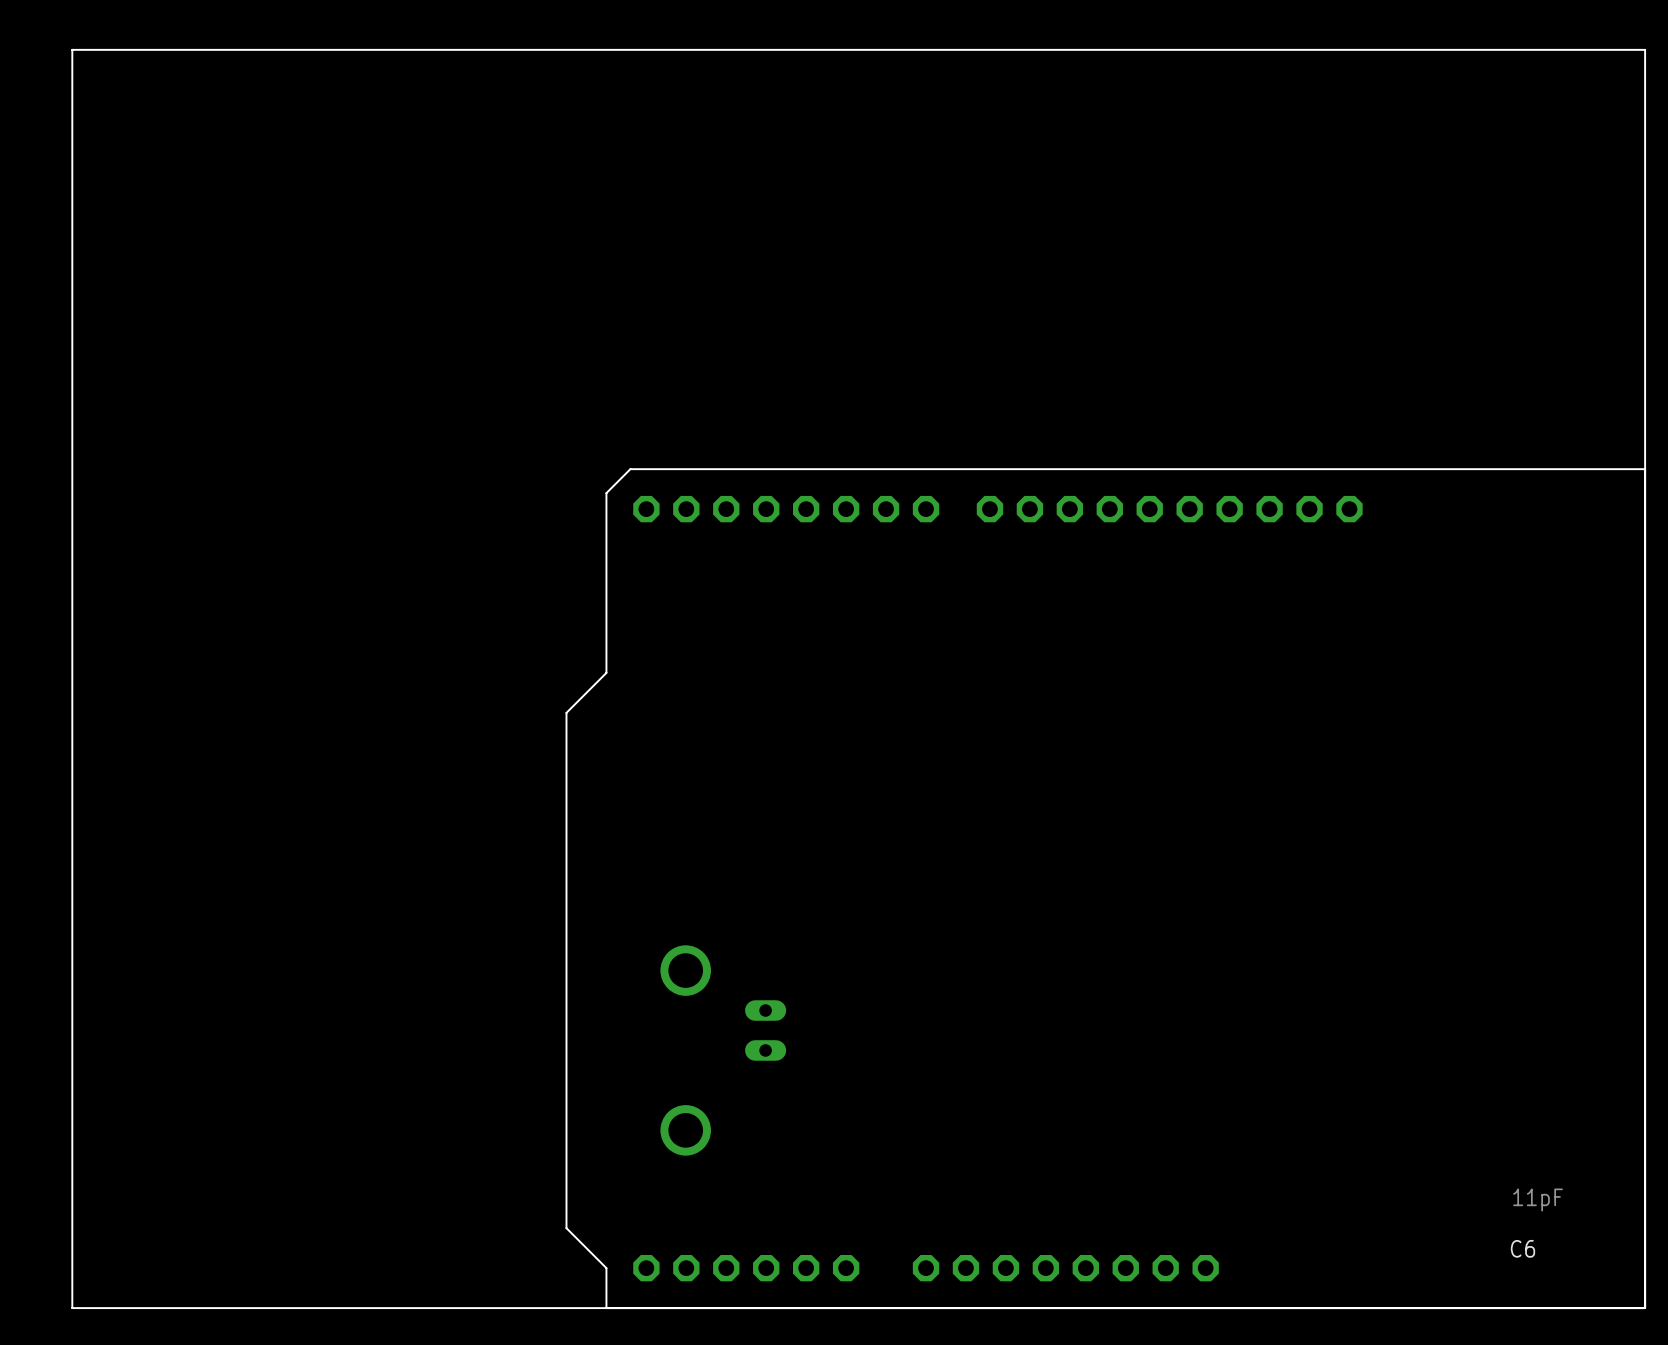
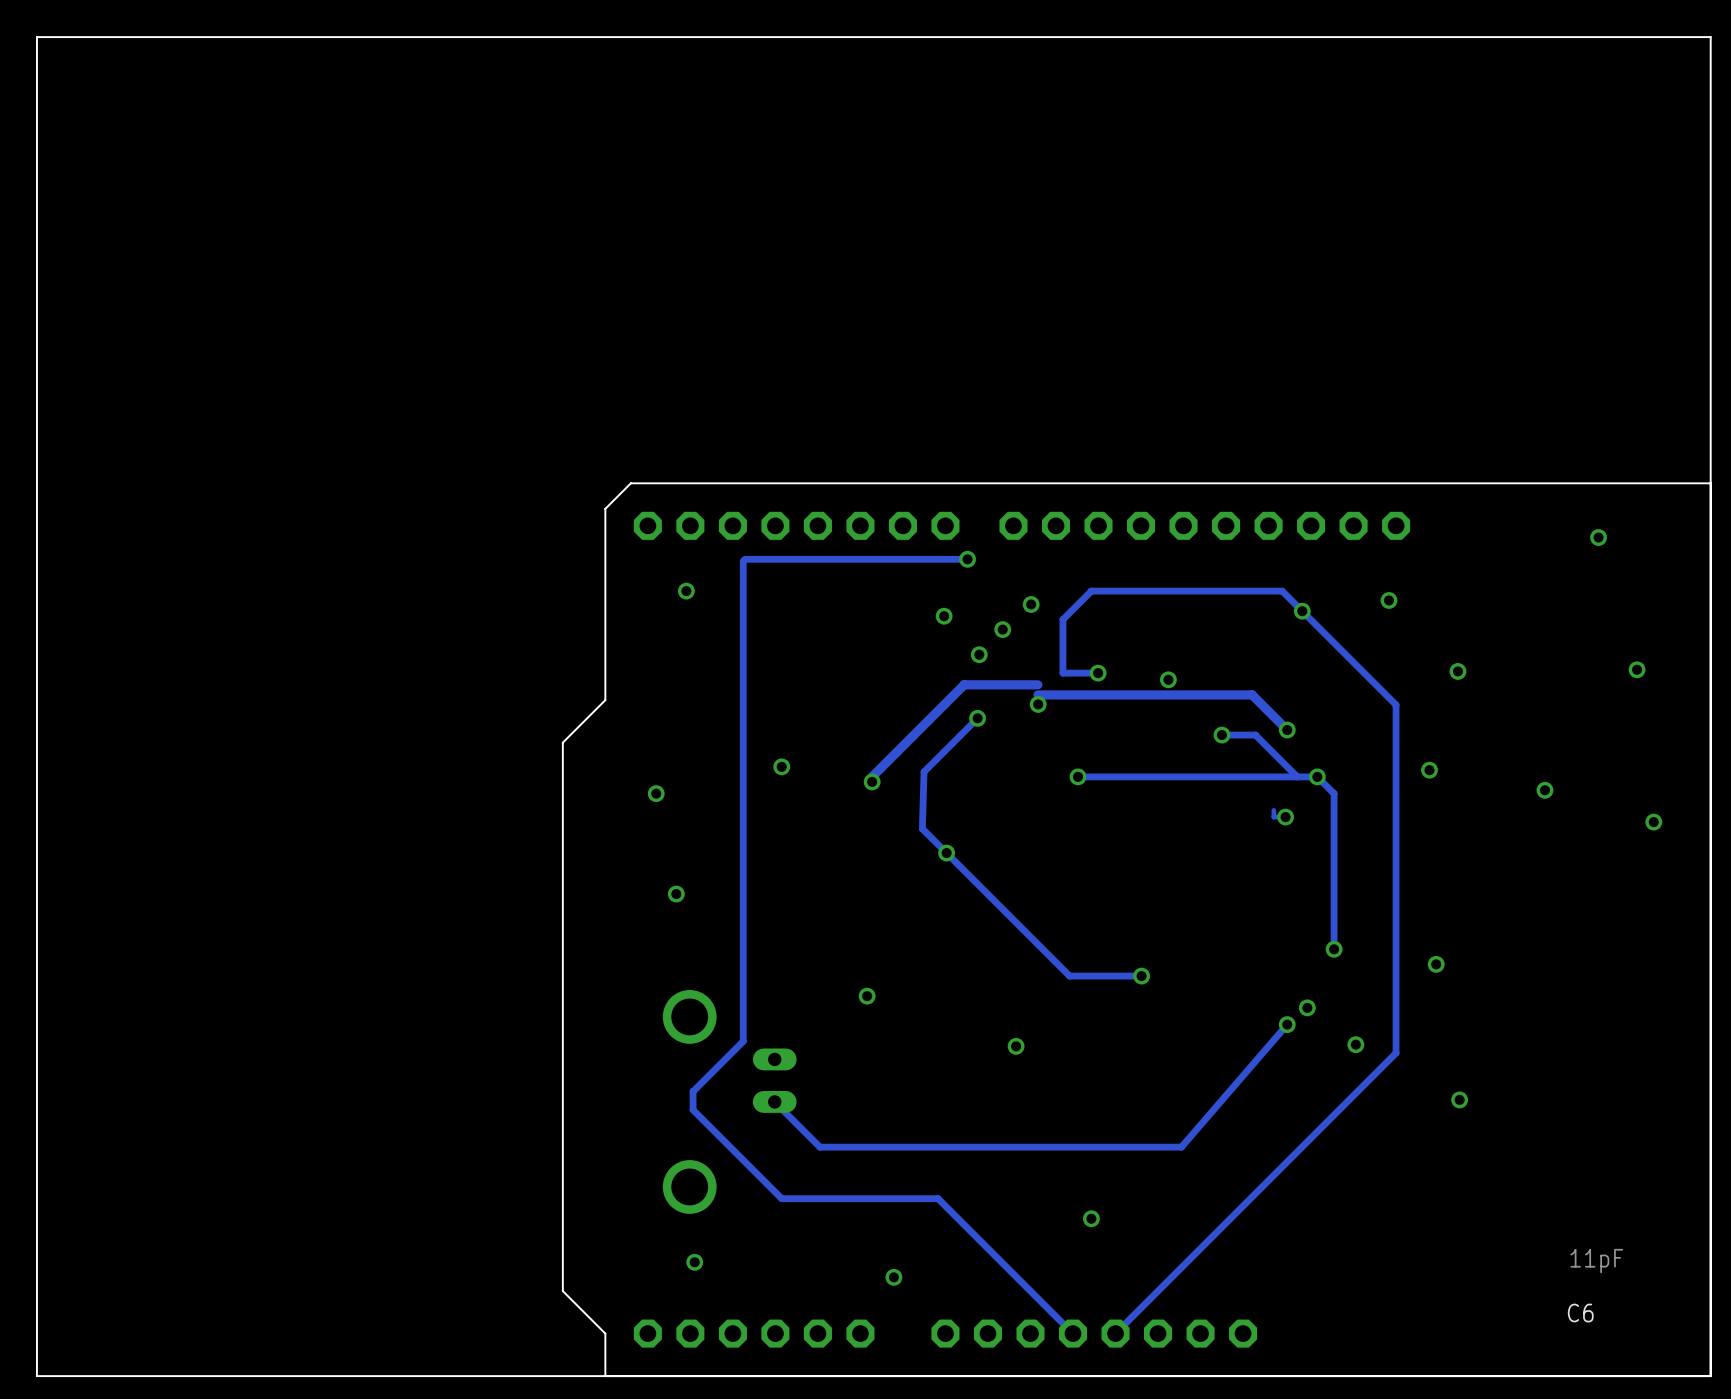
via: none -> (1598, 537)
track: none -> (967, 559) (744, 559) (743, 560) (743, 1041) (693, 1091) (693, 1109) (781, 1198) (938, 1198) (1073, 1333)
via: none -> (967, 559)
via: none -> (686, 591)
via: none -> (1389, 600)
via: none -> (1031, 604)
via: none -> (1302, 611)
via: none -> (944, 616)
via: none -> (1002, 629)
via: none -> (979, 654)
via: none -> (1637, 669)
via: none -> (1457, 671)
track: none -> (1098, 673) (1062, 673) (1062, 619) (1091, 591) (1282, 591) (1396, 704) (1396, 1053) (1115, 1333)
via: none -> (1098, 673)
via: none -> (1168, 679)
track: none -> (1037, 684) (964, 684) (872, 776) (872, 781)
track: none -> (1038, 694) (1252, 694) (1287, 730)
via: none -> (1038, 704)
track: none -> (977, 718) (924, 771) (922, 828) (1069, 976) (1141, 976)
via: none -> (977, 718)
via: none -> (1287, 730)
track: none -> (1221, 735) (1255, 735) (1297, 776)
via: none -> (1221, 735)
via: none -> (781, 766)
via: none -> (1429, 770)
track: none -> (1078, 776) (1317, 776) (1334, 793) (1334, 949)
via: none -> (1078, 776)
via: none -> (1317, 776)
via: none -> (872, 781)
via: none -> (1545, 790)
via: none -> (656, 793)
track: none -> (1273, 810) (1273, 817) (1285, 817)
via: none -> (1285, 817)
via: none -> (1653, 822)
via: none -> (946, 853)
via: none -> (676, 894)
via: none -> (1334, 949)
via: none -> (1436, 964)
via: none -> (1141, 976)
via: none -> (867, 996)
via: none -> (1307, 1007)
track: none -> (1287, 1024) (1181, 1147) (819, 1147) (774, 1101)
via: none -> (1287, 1024)
via: none -> (1355, 1044)
via: none -> (1016, 1046)
via: none -> (1459, 1099)
via: none -> (1091, 1218)
via: none -> (694, 1262)
via: none -> (893, 1277)

